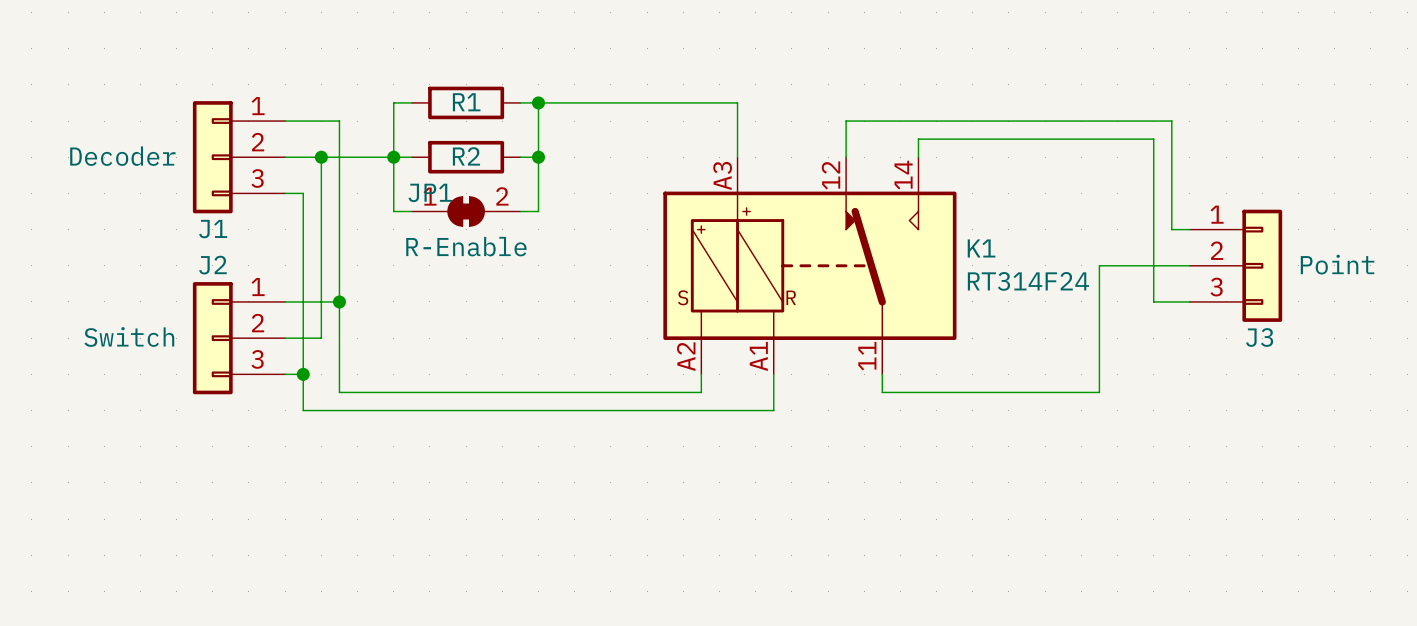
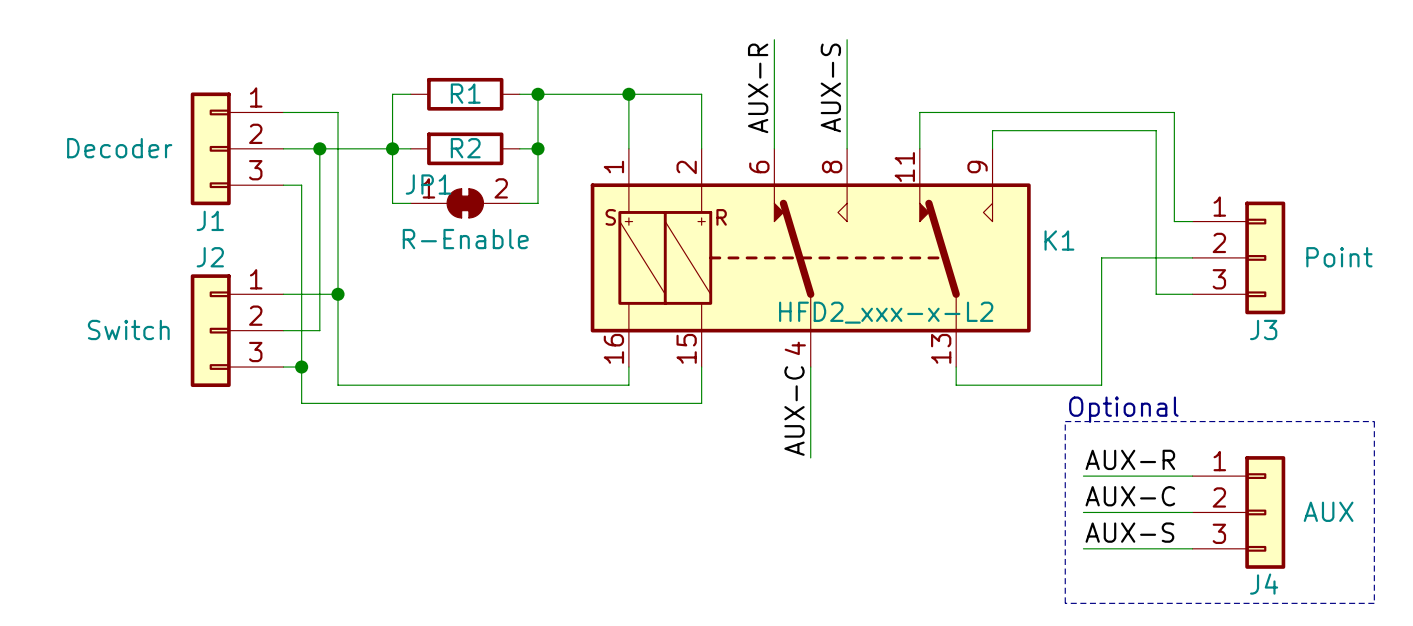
wire: none -> (774, 39) (774, 148)
wire: none -> (847, 39) (847, 112)
label: none -> AUX-R (758, 88)
label: none -> AUX-S (830, 87)
wire: none -> (628, 94) (628, 148)
junction: none -> (628, 94)
wire: (701, 102) (737, 102) (737, 157) -> (701, 94) (701, 148)
wire: (846, 121) (918, 121) -> (919, 130) (919, 112)
wire: (918, 139) (990, 139) -> (992, 148) (992, 130)
K1 symbol: [663, 157, 957, 375] -> [590, 148, 1031, 368]
K1 name position: K1 (981, 248) -> K1 (1059, 240)
K1 value: RT314F24 (1028, 281) -> HFD2_xxx-x-L2 (886, 312)
wire: (773, 374) (773, 410) (701, 410) -> (701, 385) (701, 403)
wire: none -> (810, 367) (810, 457)
wire: (882, 374) (882, 392) (954, 392) -> (956, 367) (956, 385)
wire: (628, 392) (701, 392) -> (628, 385) (628, 367)
text: none -> Optional (1123, 409)
label: none -> AUX-C (794, 411)
line: none -> (1065, 421) (1065, 603) (1374, 603) (1374, 421) (1065, 421)
label: none -> AUX-R (1130, 459)
wire: none -> (1083, 476) (1192, 476)
label: none -> AUX-C (1130, 496)
wire: none -> (1083, 512) (1192, 512)
J4: none -> AUX (1238, 512)
label: none -> AUX-S (1129, 532)
wire: none -> (1083, 548) (1192, 548)

